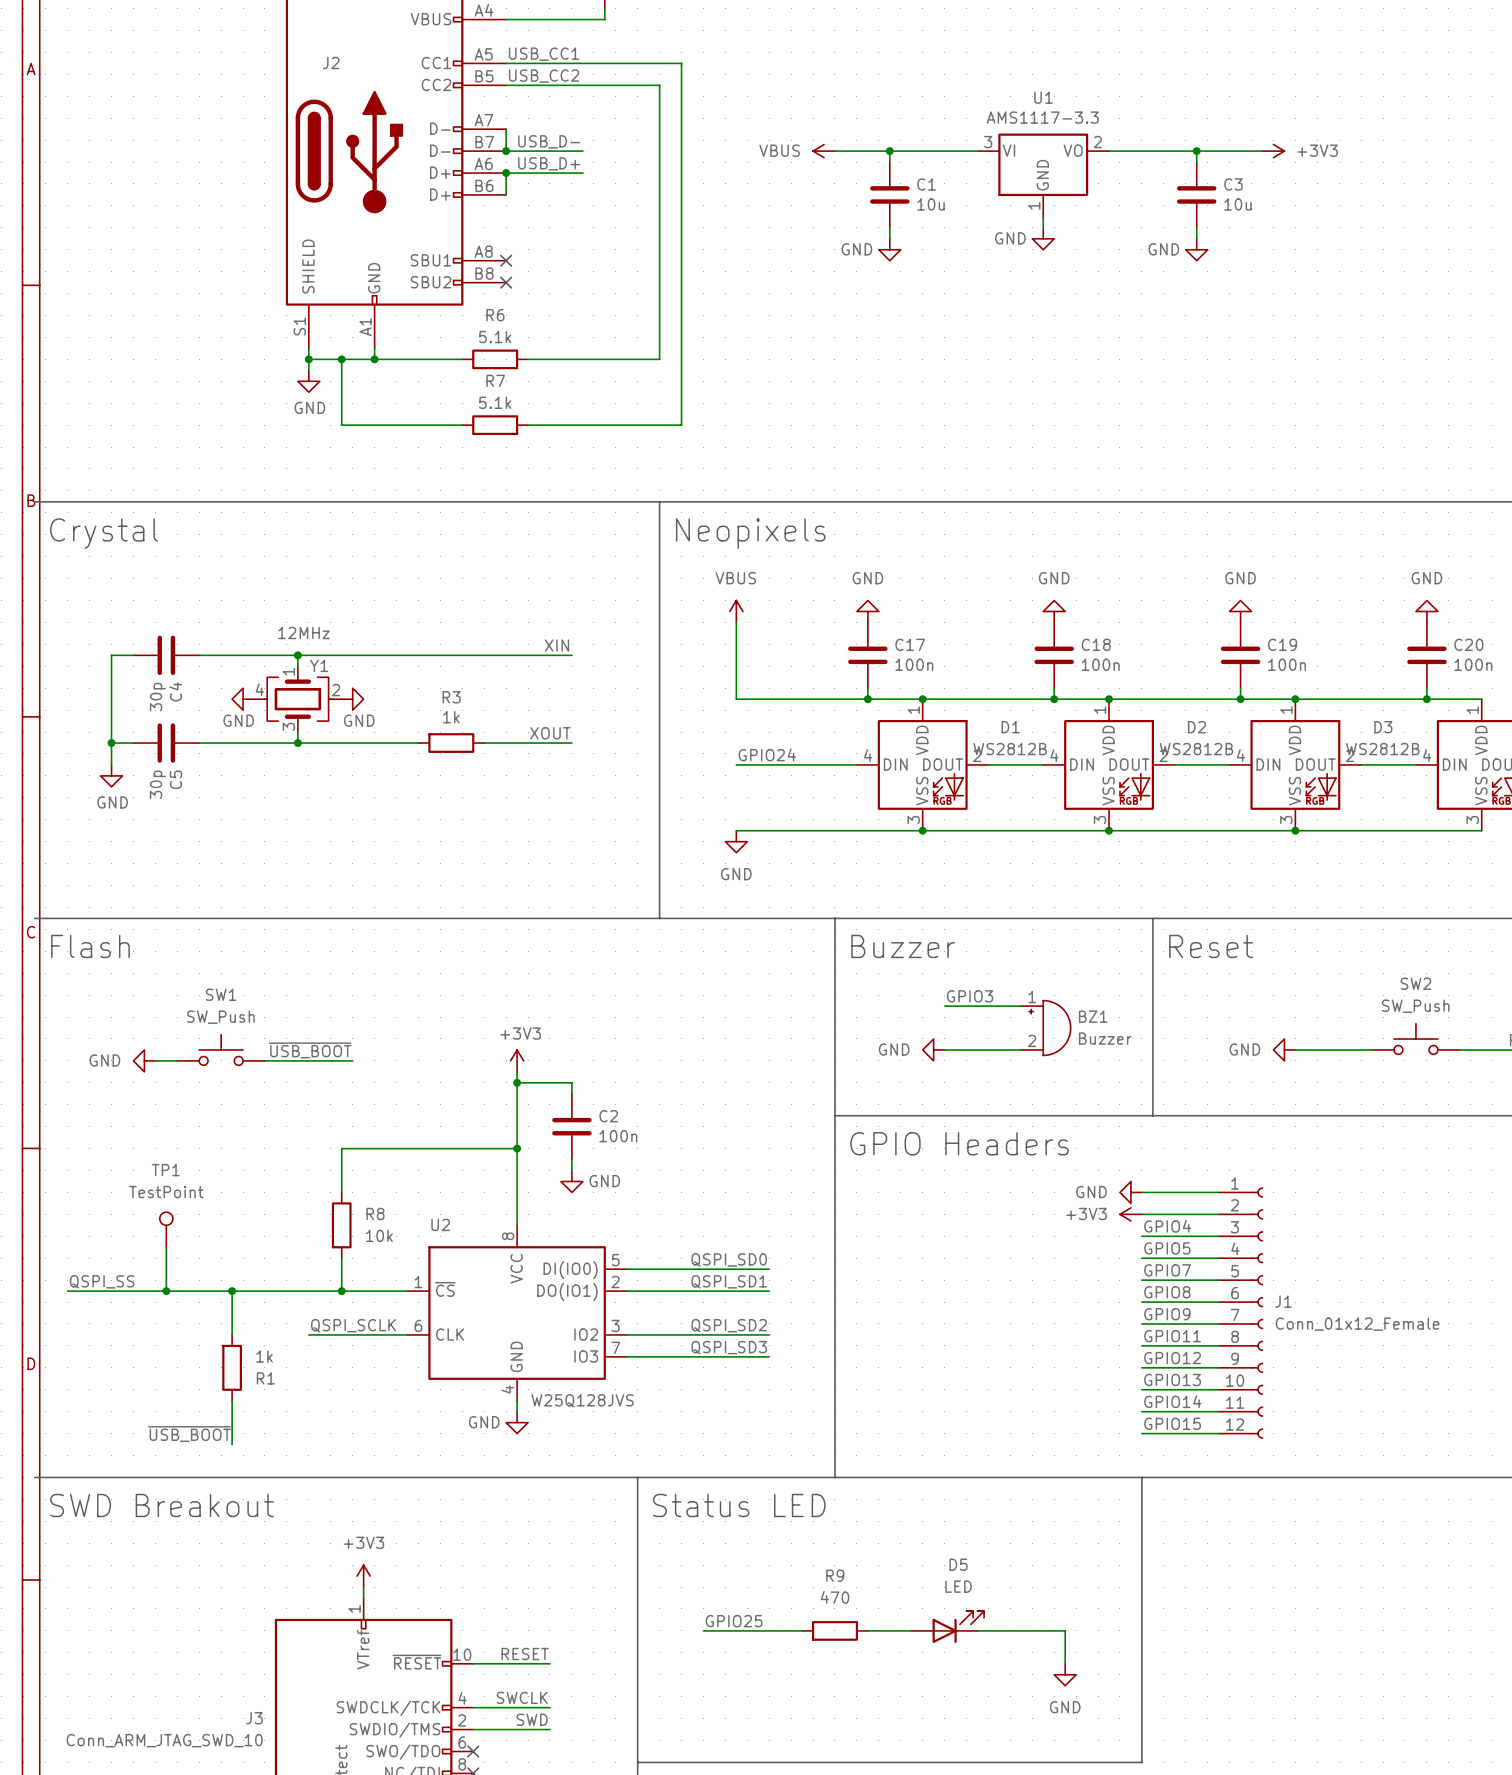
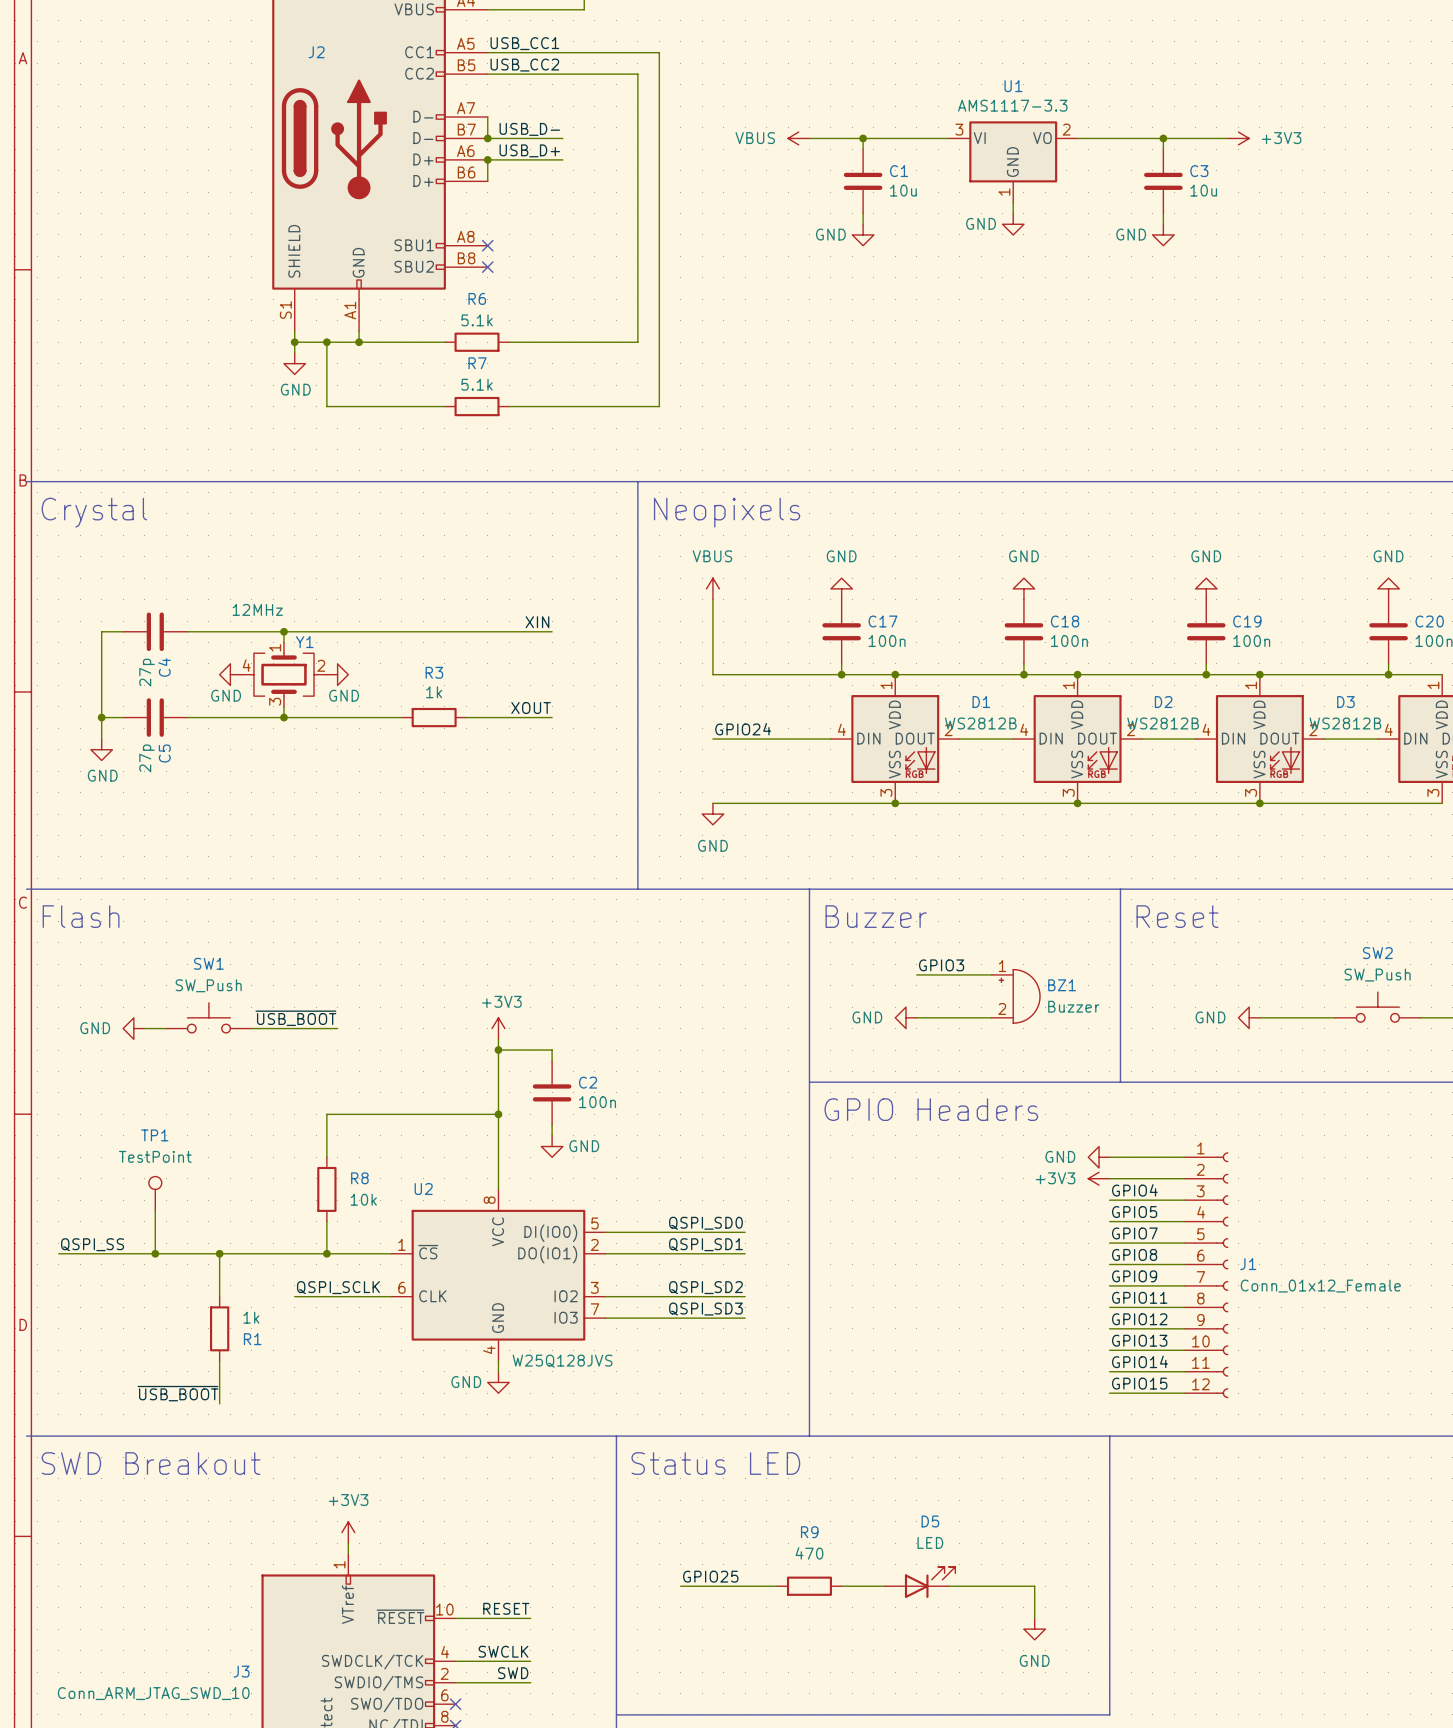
Y1 value position: 12MHz (303, 633) -> 12MHz (257, 609)
C4 value: 30p (157, 697) -> 27p (147, 672)
C5 value: 30p (157, 784) -> 27p (147, 758)

